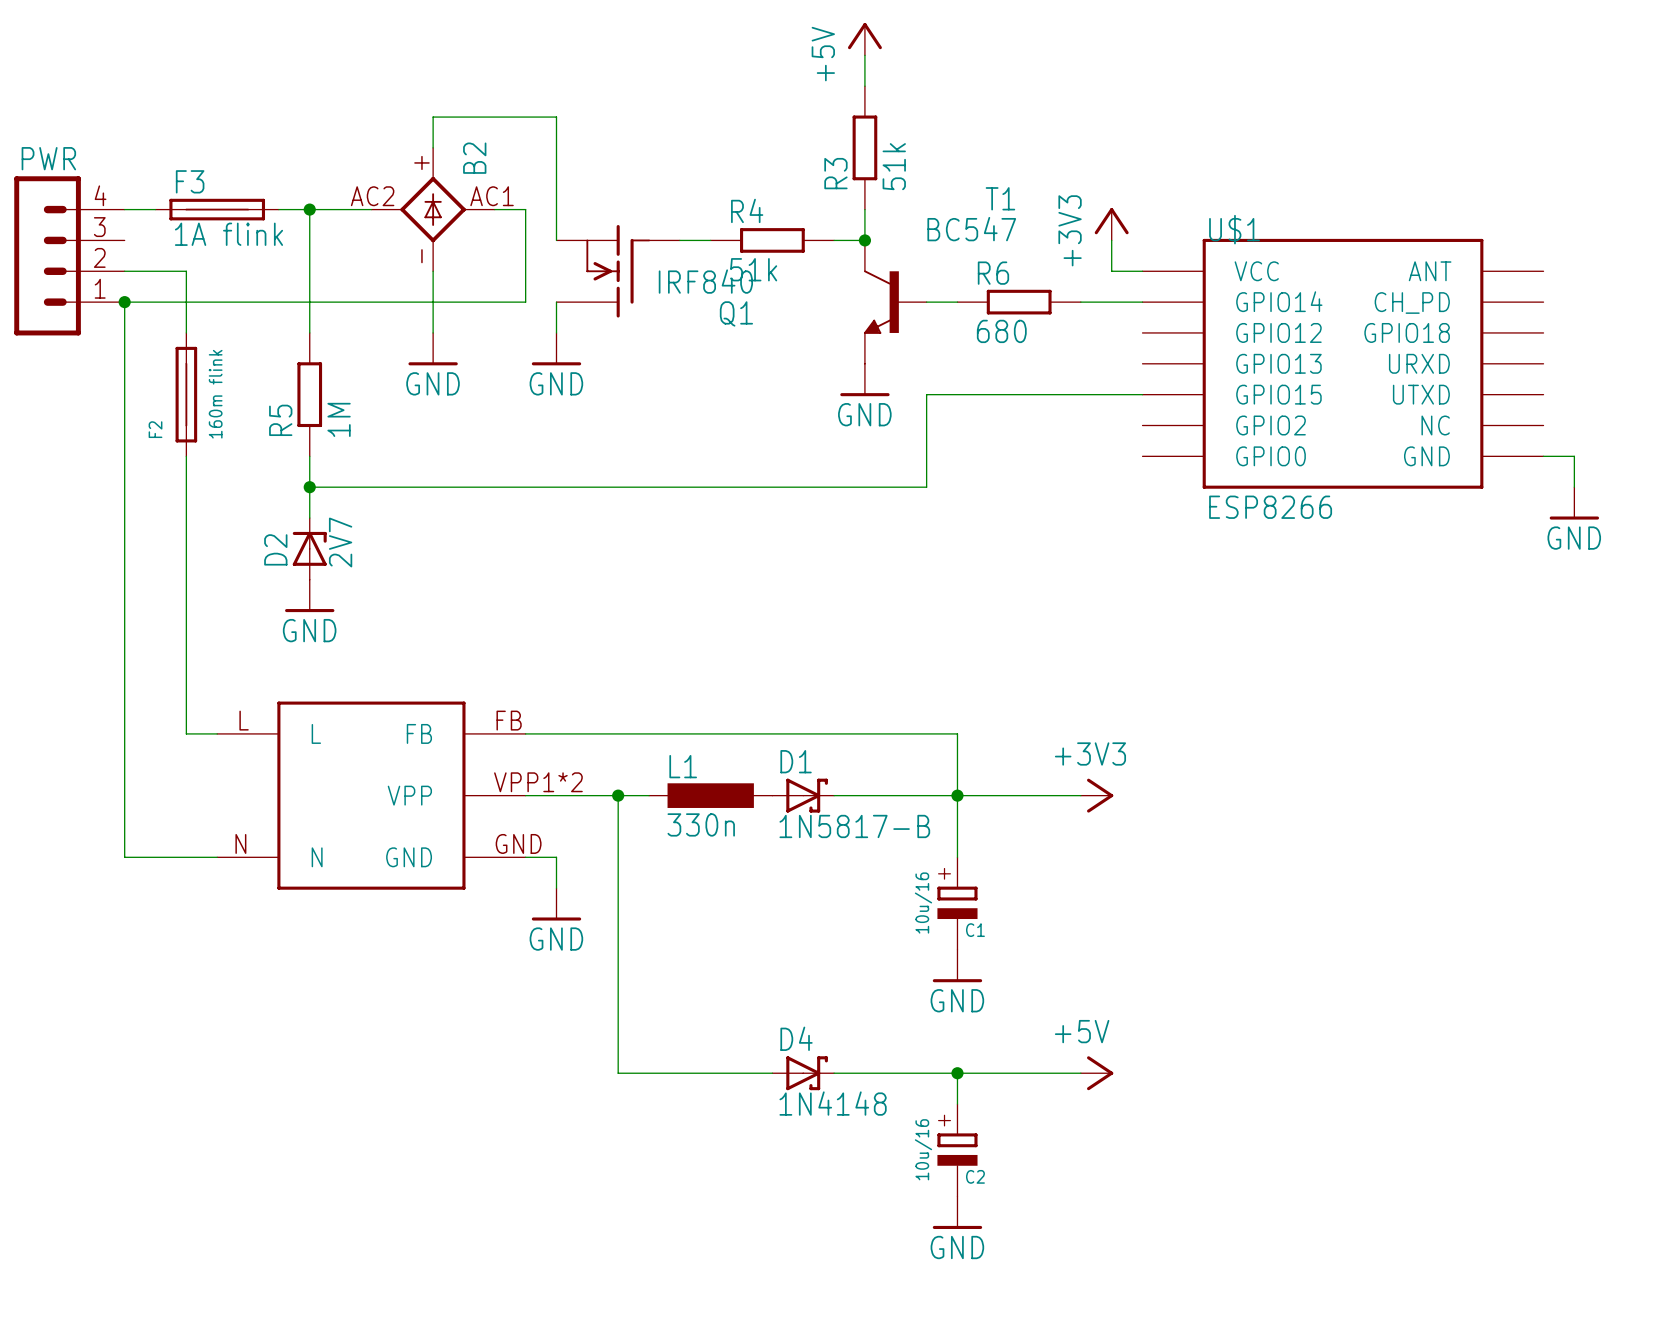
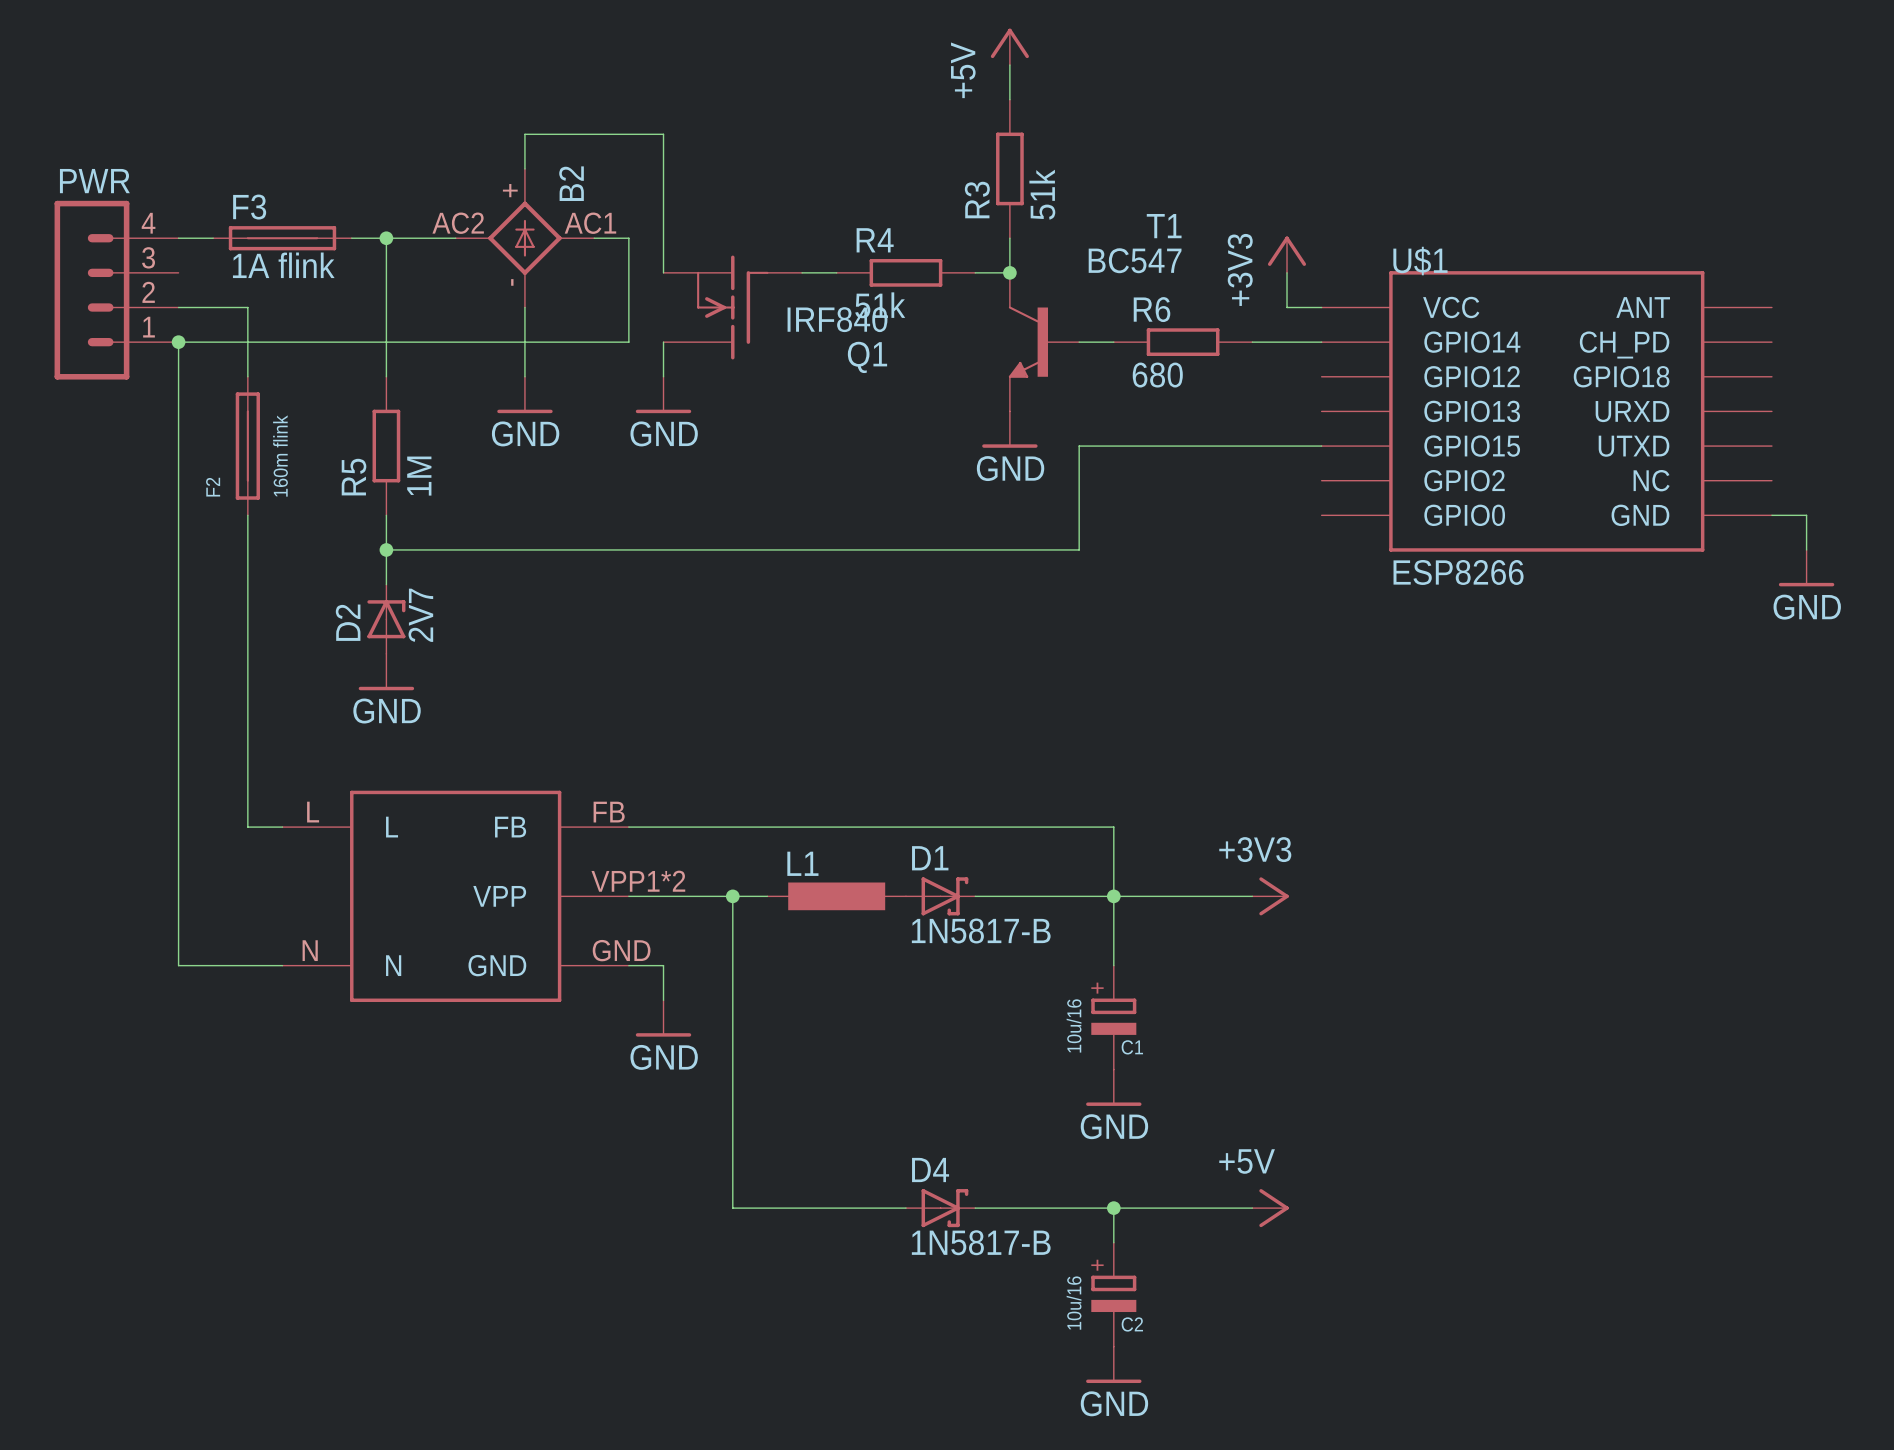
L1 value: 330n (701, 824) -> none
D4 value: 1N4148 (833, 1103) -> 1N5817-B (981, 1242)

